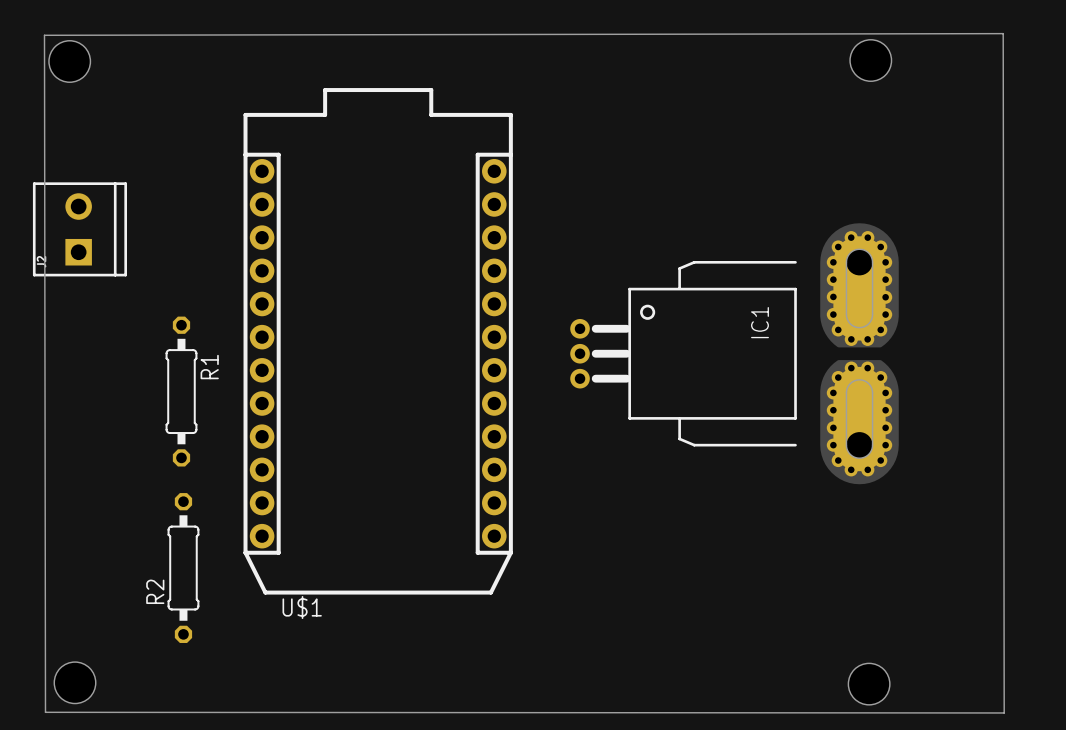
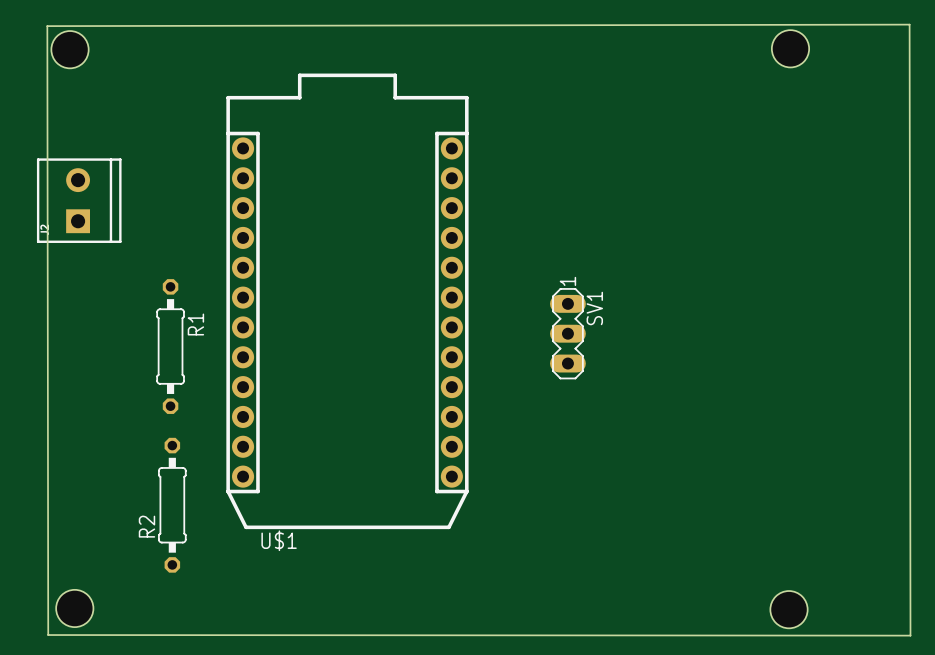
IC1: (734, 353) -> none
SV1: none -> (567, 333)

